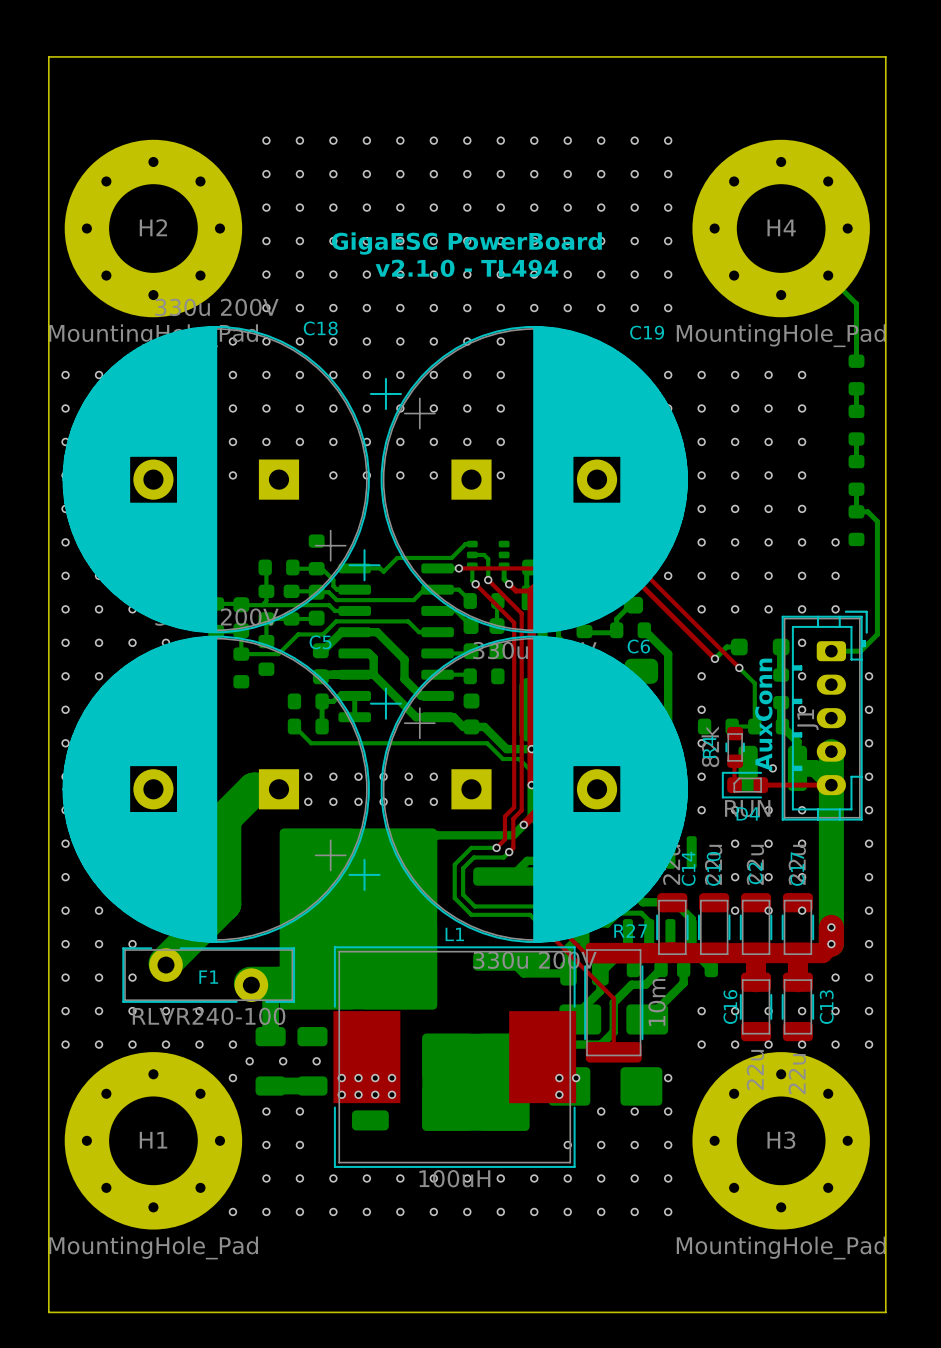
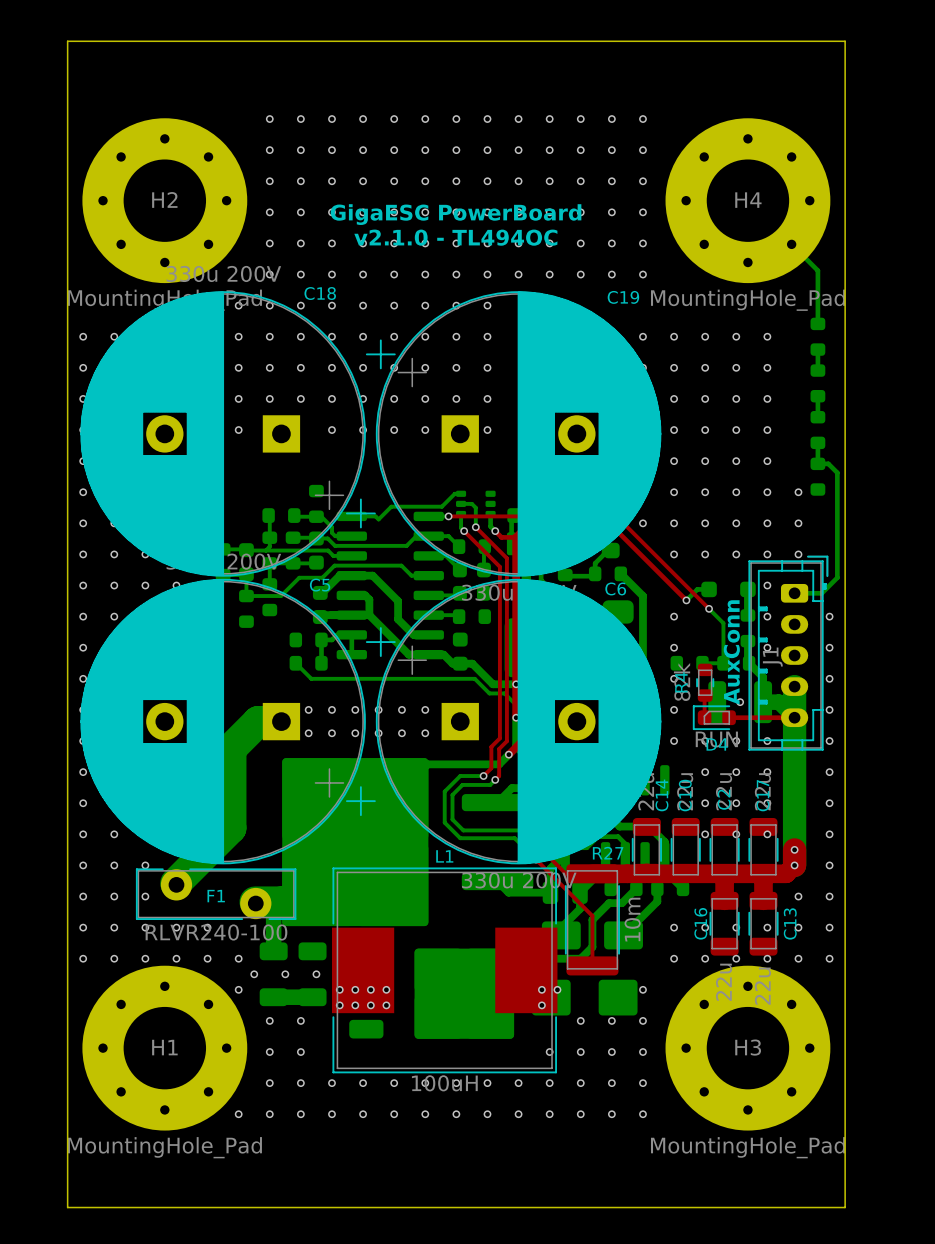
text: v2.1.0 - TL494 (466, 268) -> v2.1.0 - TL494OC (455, 237)

